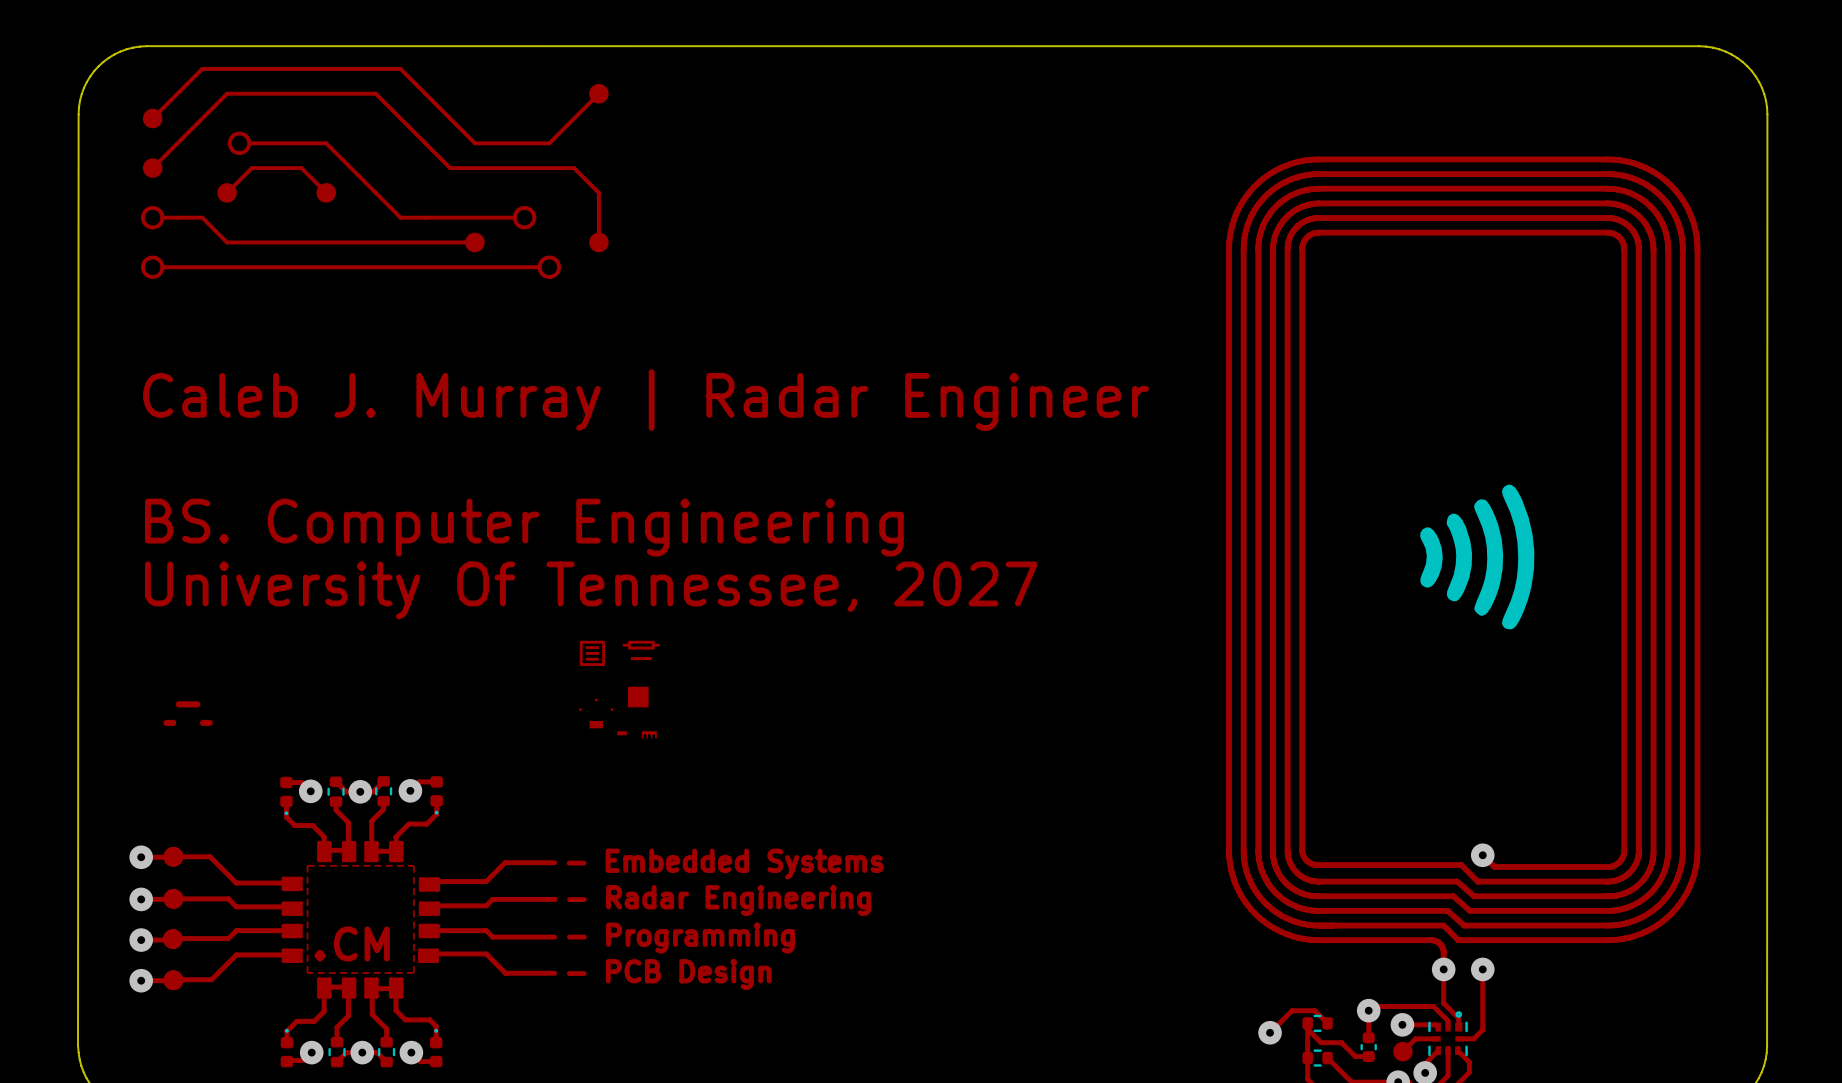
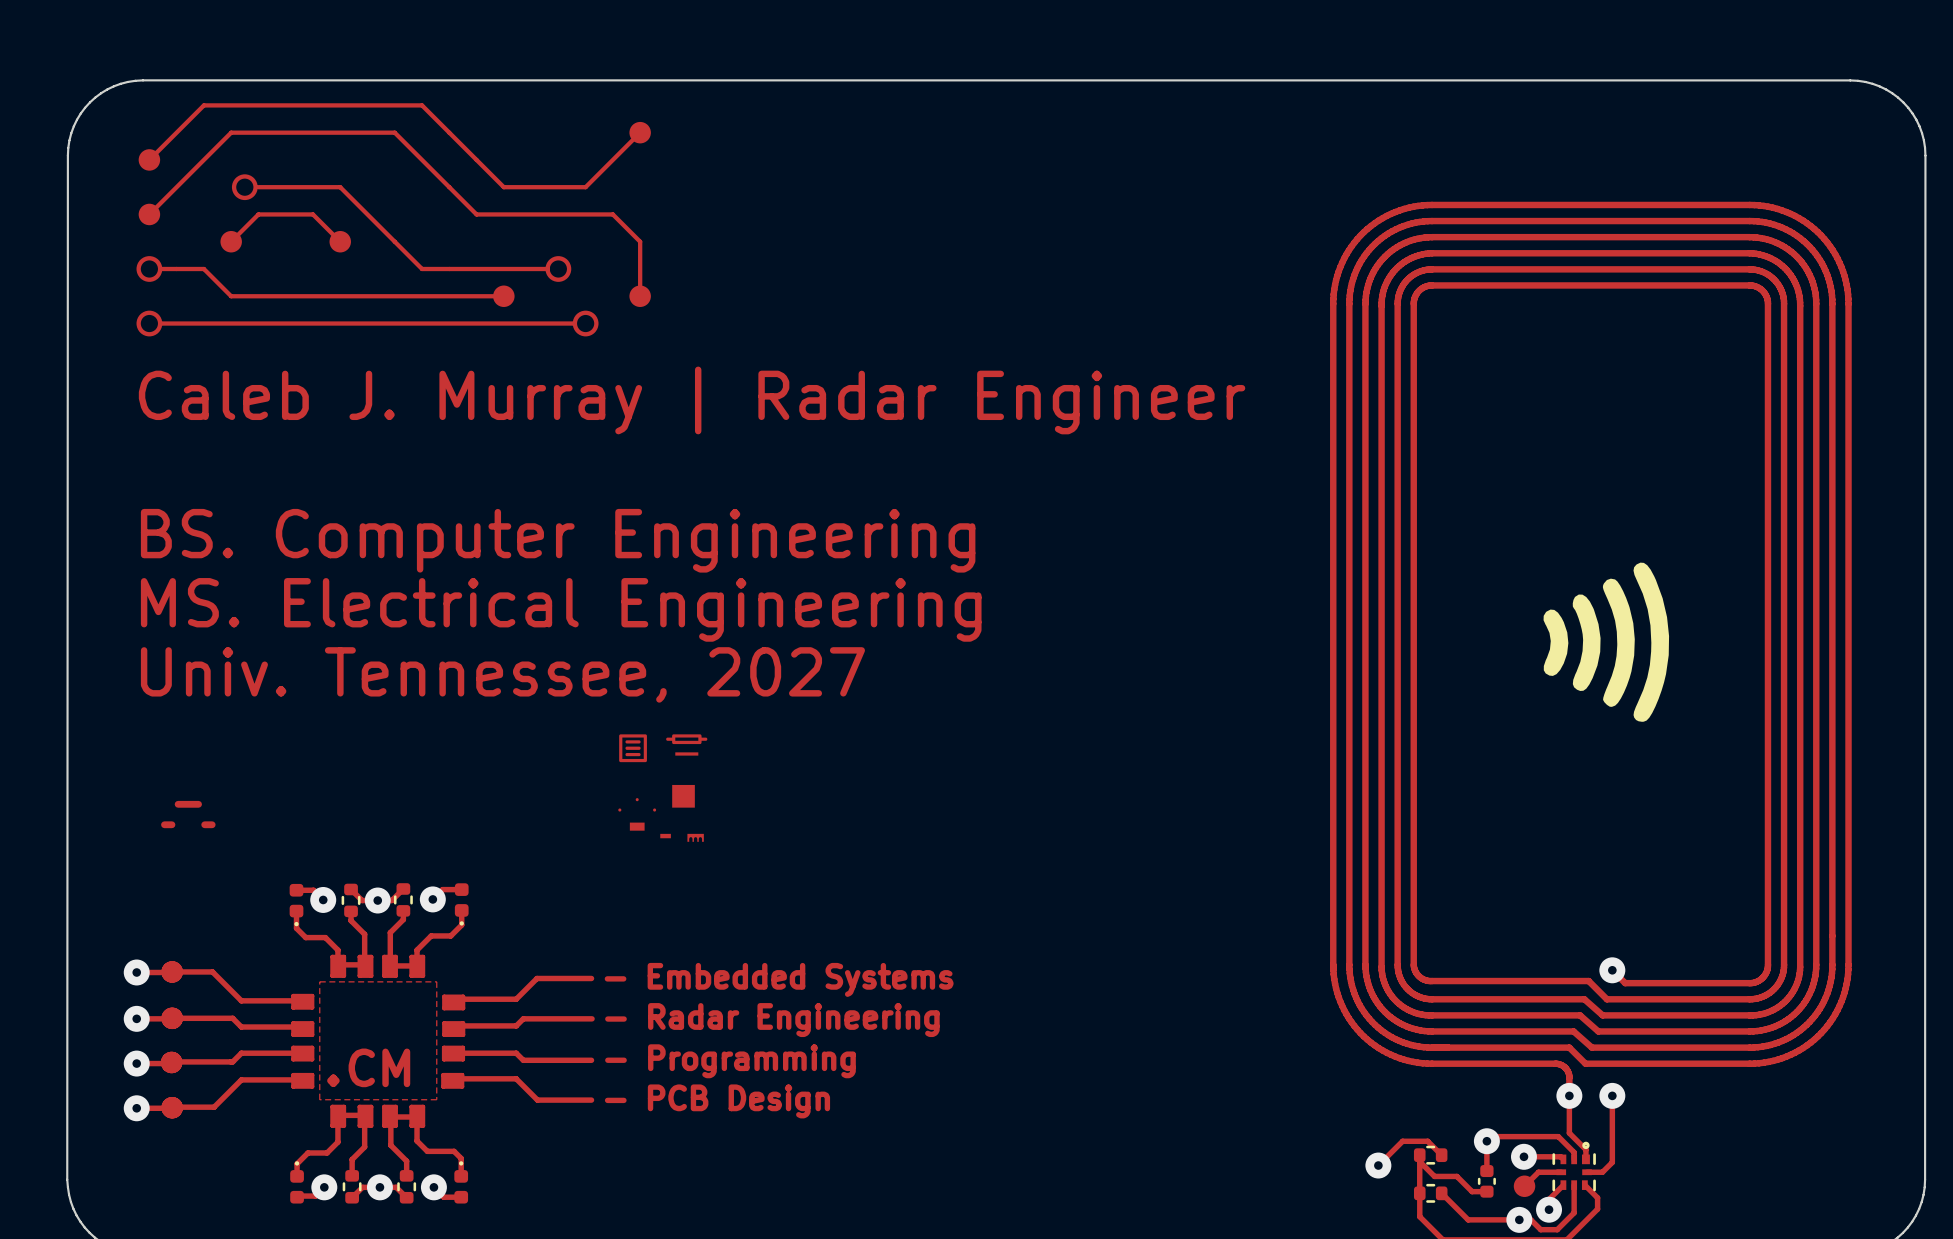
text position: Caleb J. Murray | Radar Engineer (646, 400) -> Caleb J. Murray | Radar Engineer (692, 400)
text: none -> BS. Computer Engineering (558, 540)
text: BS. Computer Engineering (524, 527) -> MS. Electrical Engineering (561, 609)
text: University Of Tennessee, 2027 (591, 590) -> Univ. Tennessee, 2027 (502, 674)

